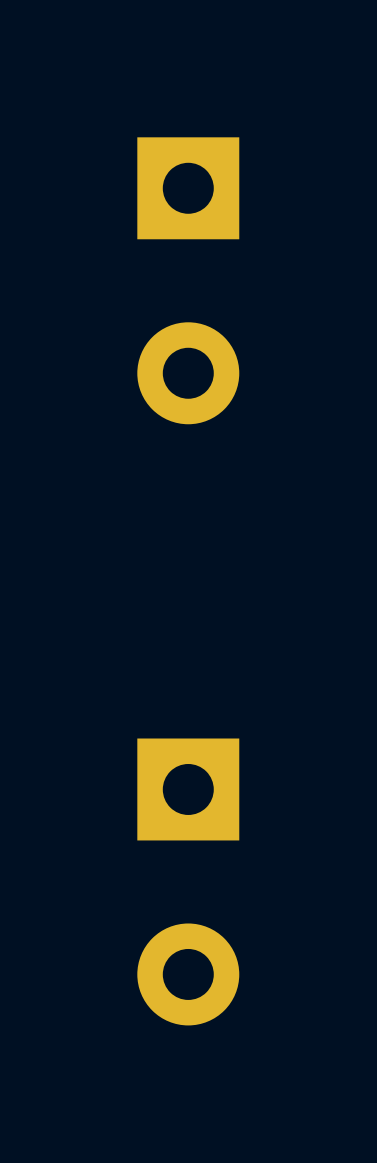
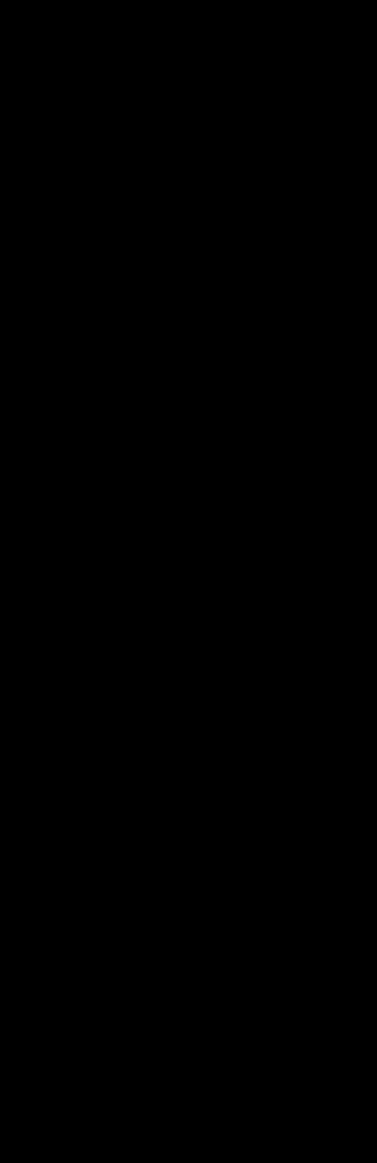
part: (188, 280) -> none
part: (188, 881) -> none

